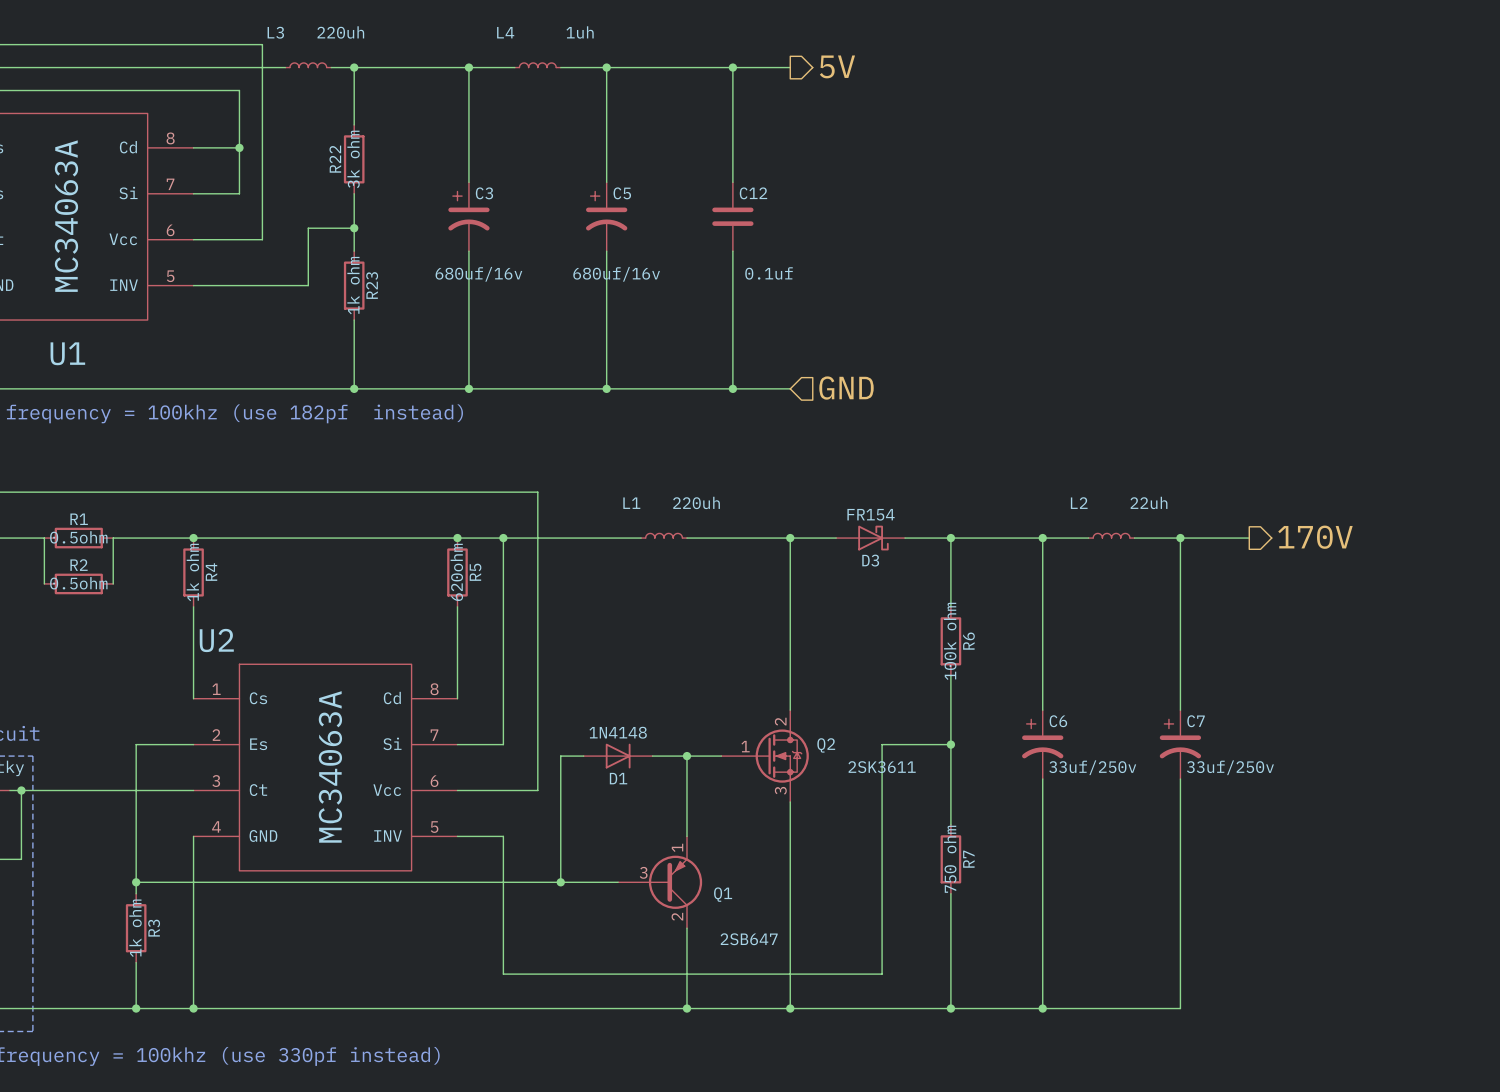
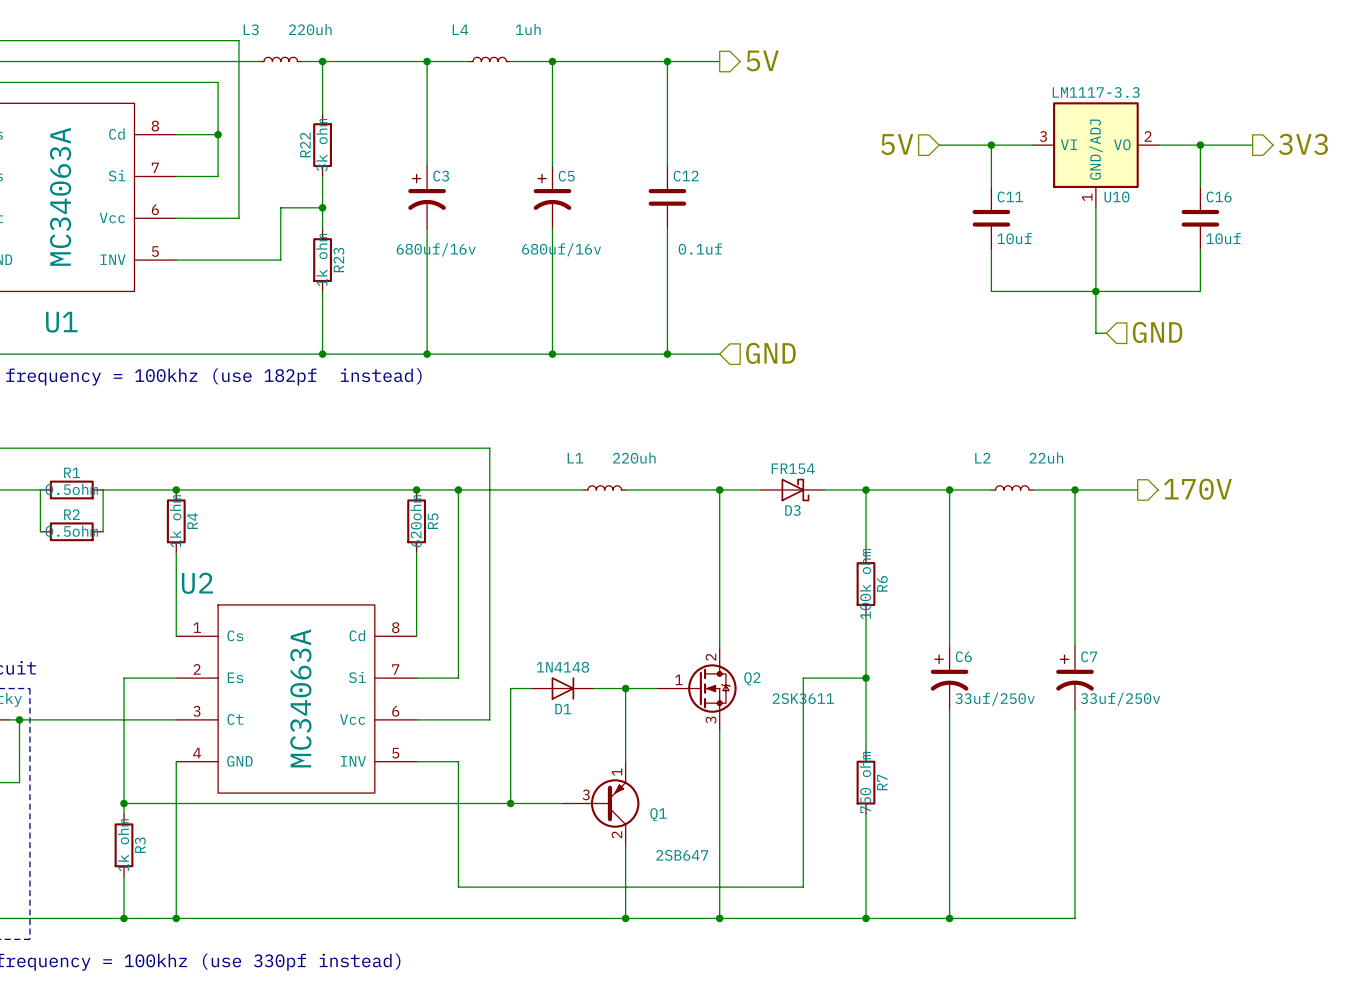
hierarchical label: none -> 5V (897, 144)
hierarchical label: none -> 3V3 (1303, 144)
wire: none -> (939, 145) (1033, 145)
wire: none -> (991, 145) (991, 186)
junction: none -> (991, 145)
wire: none -> (1158, 145) (1252, 145)
wire: none -> (1200, 145) (1200, 186)
junction: none -> (1200, 145)
U10: none -> LM1117-3.3 (1095, 155)
wire: none -> (1095, 207) (1095, 333) (1106, 333)
C11: none -> 10uf (991, 218)
C16: none -> 10uf (1200, 218)
wire: none -> (991, 249) (991, 291) (1200, 291) (1200, 249)
junction: none -> (1095, 291)
hierarchical label: none -> GND (1157, 332)

